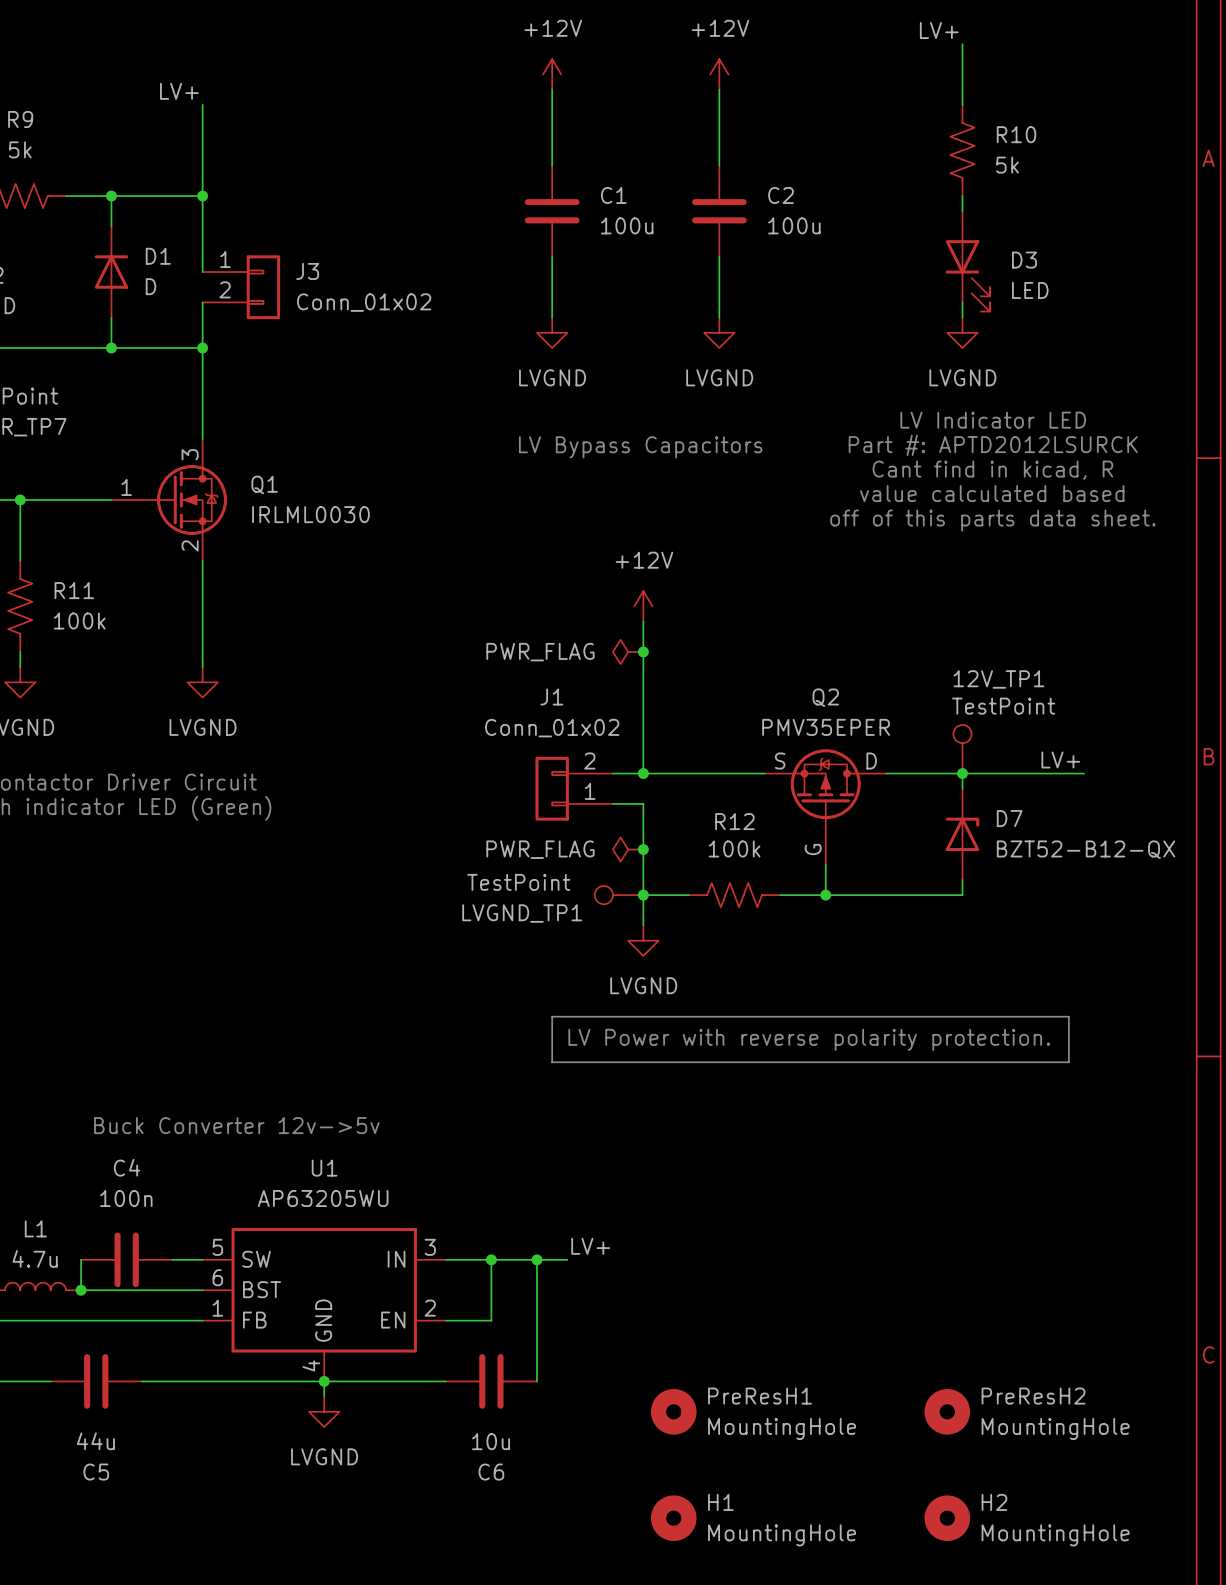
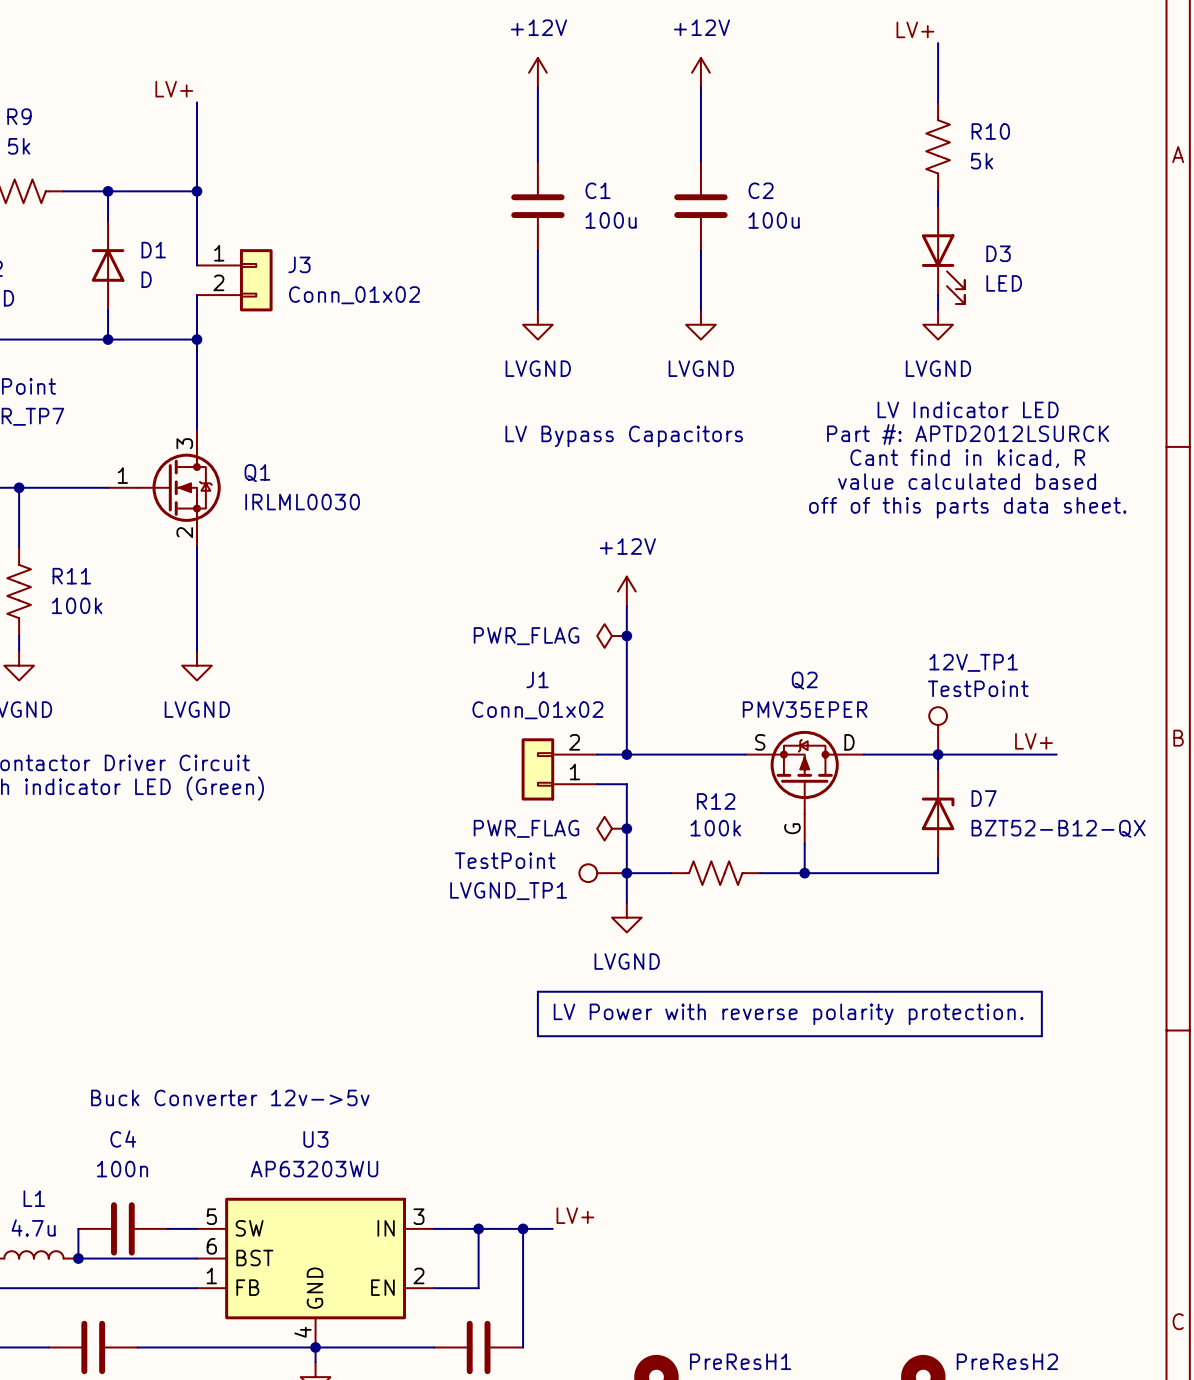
U1 name: U1 (324, 1168) -> U3 (315, 1139)
U1 value: AP63205WU (323, 1198) -> AP63203WU (314, 1169)

